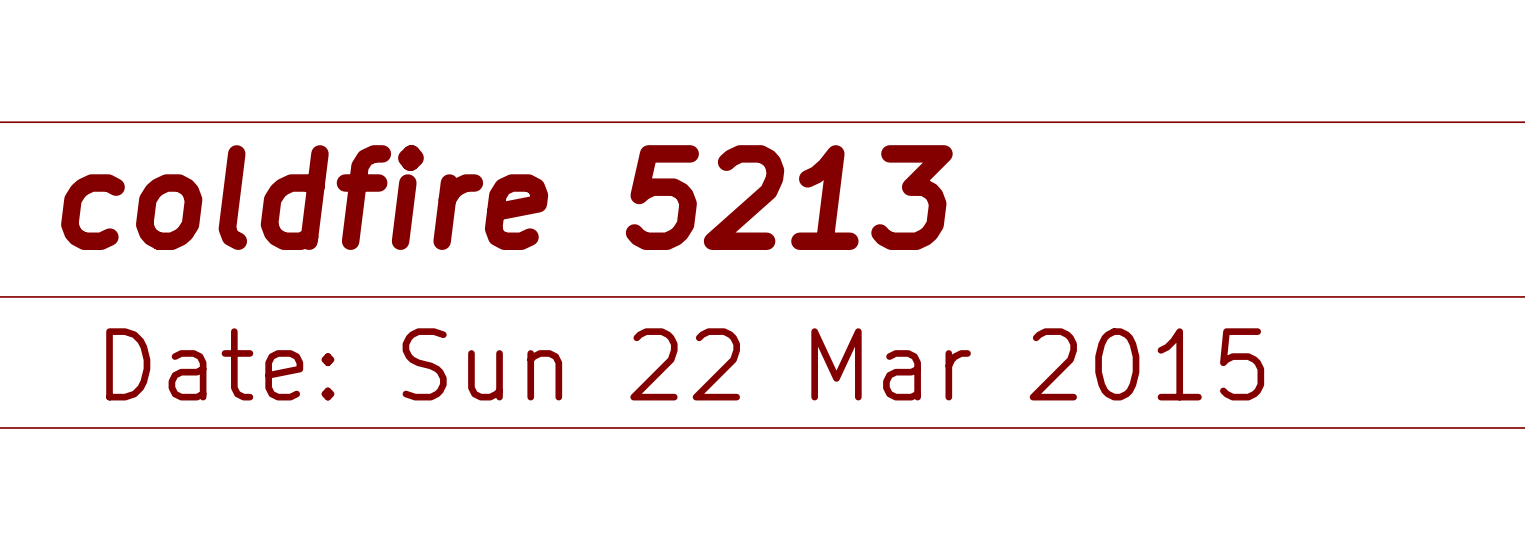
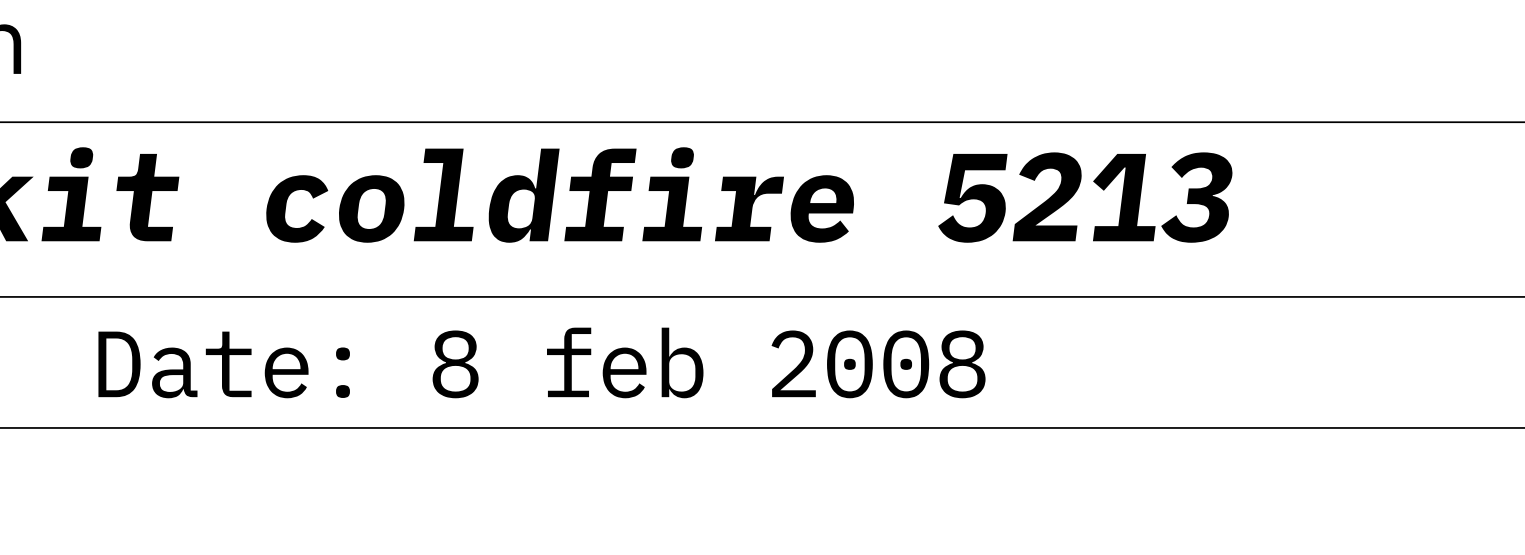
title block: Date: Sun 22 Mar 2015 (685, 364) -> Date: 8 feb 2008 (542, 362)

